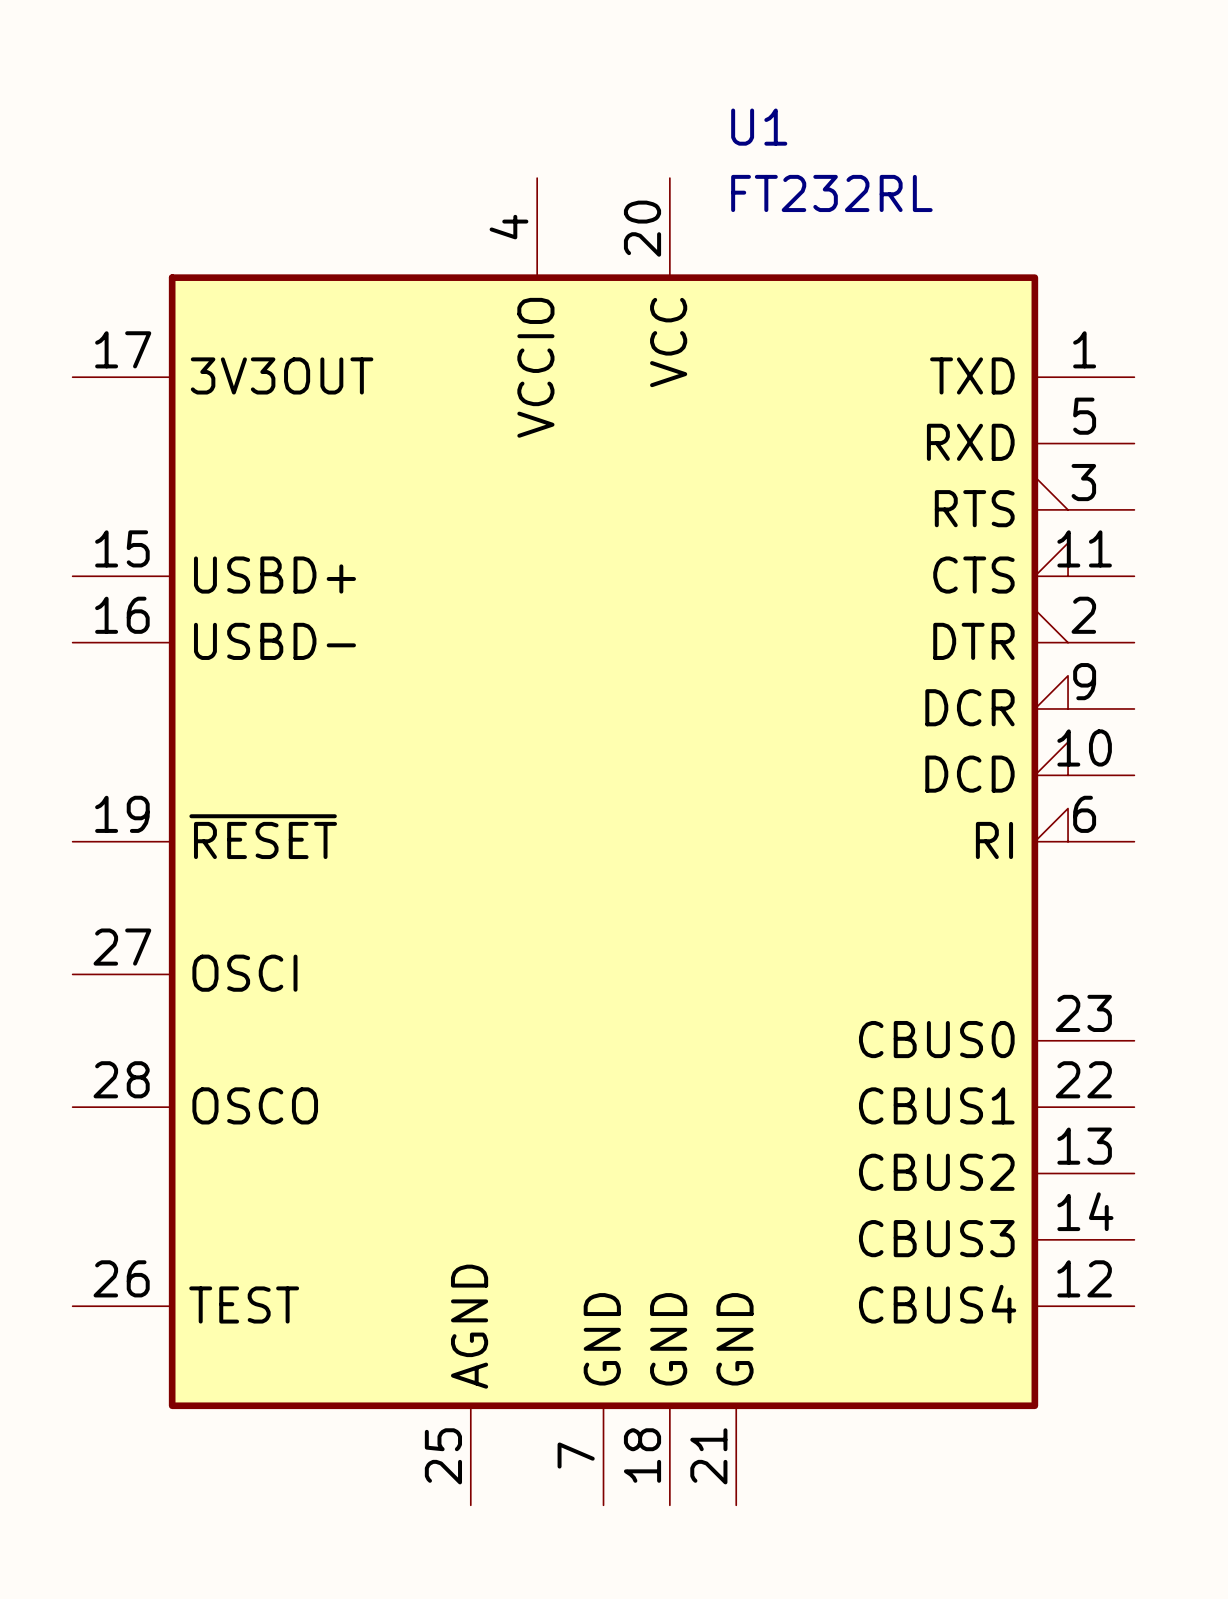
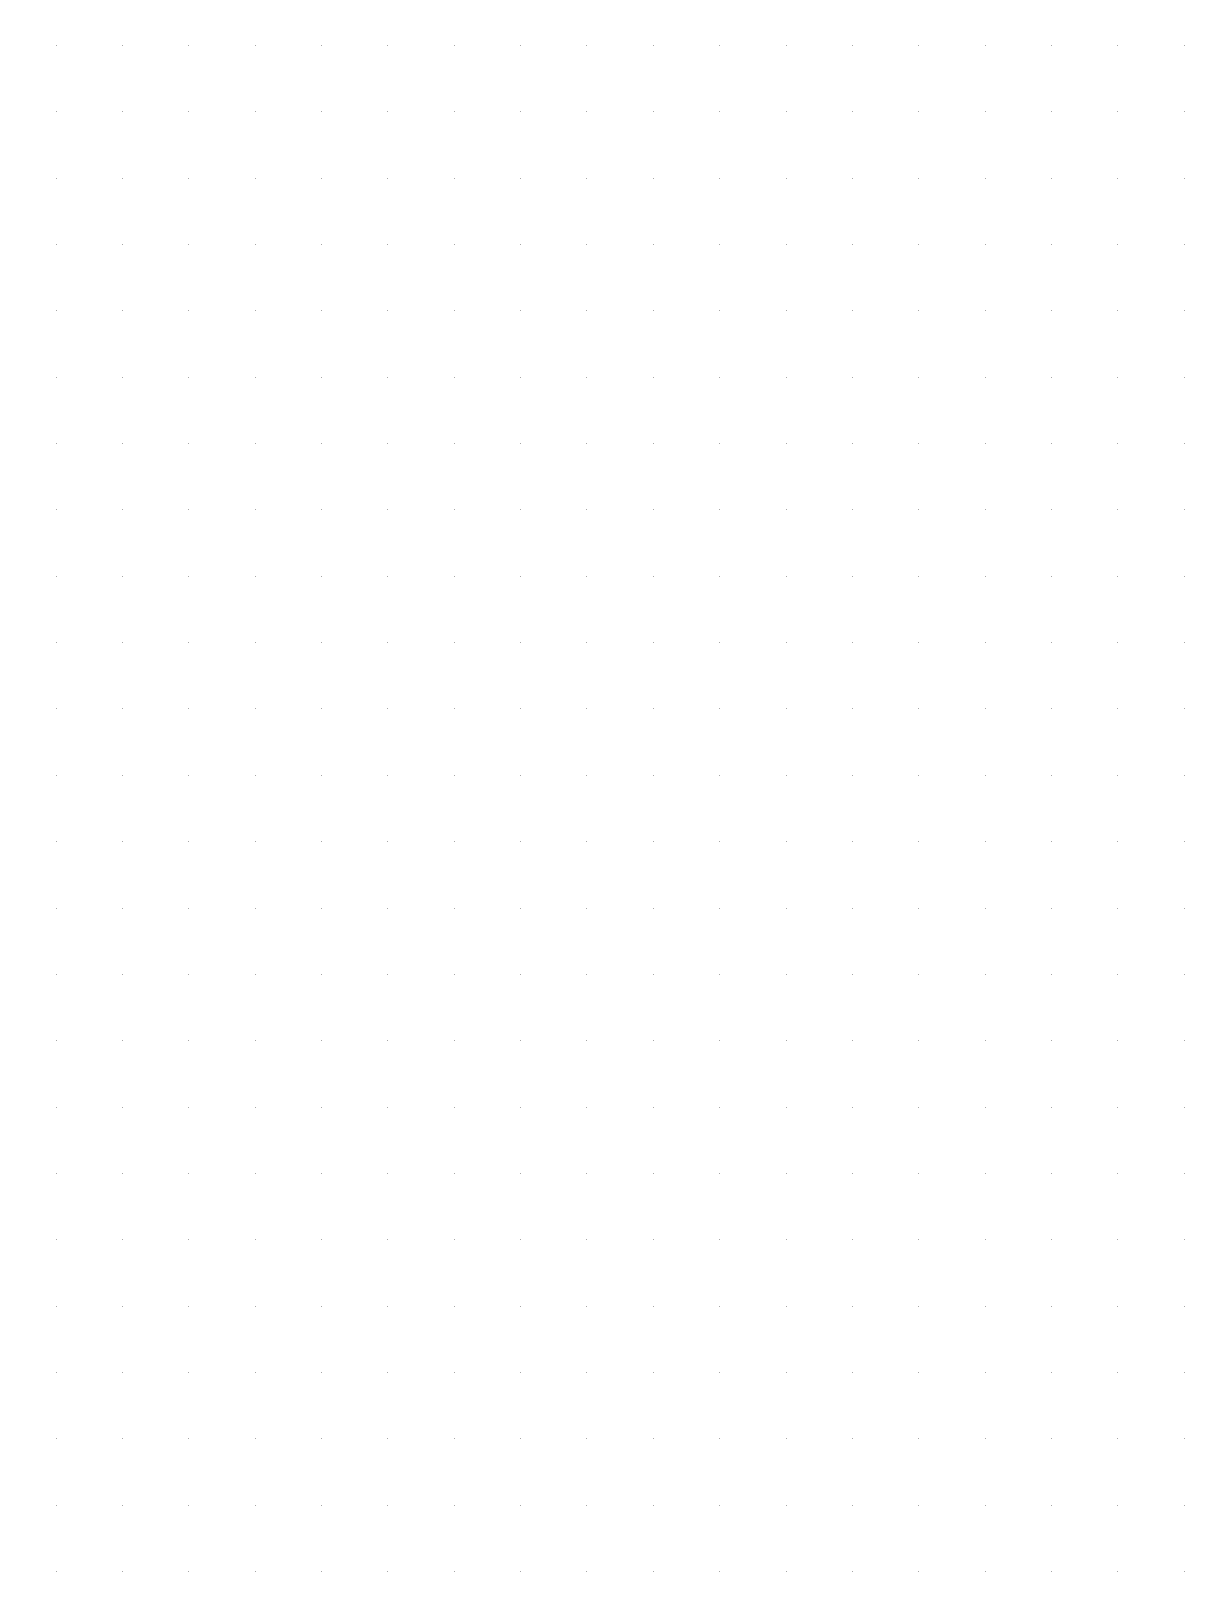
U1: FT232RL (603, 841) -> none

